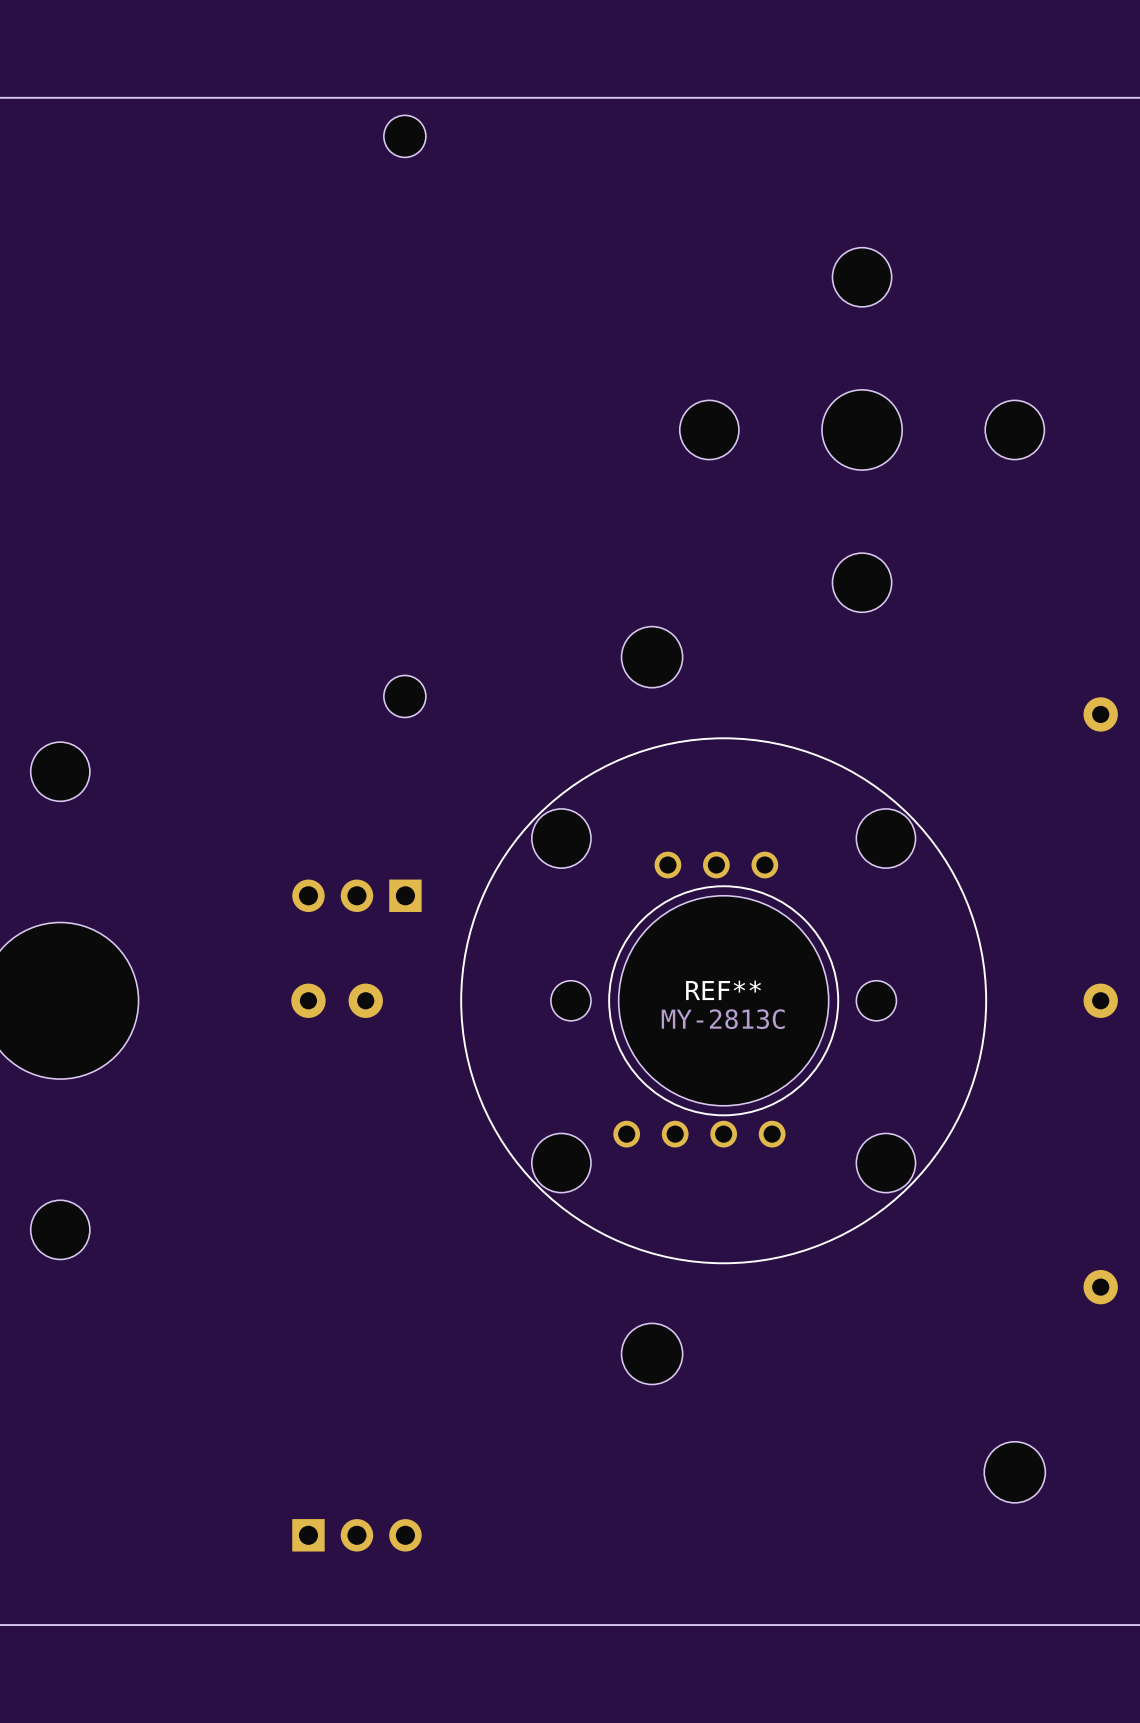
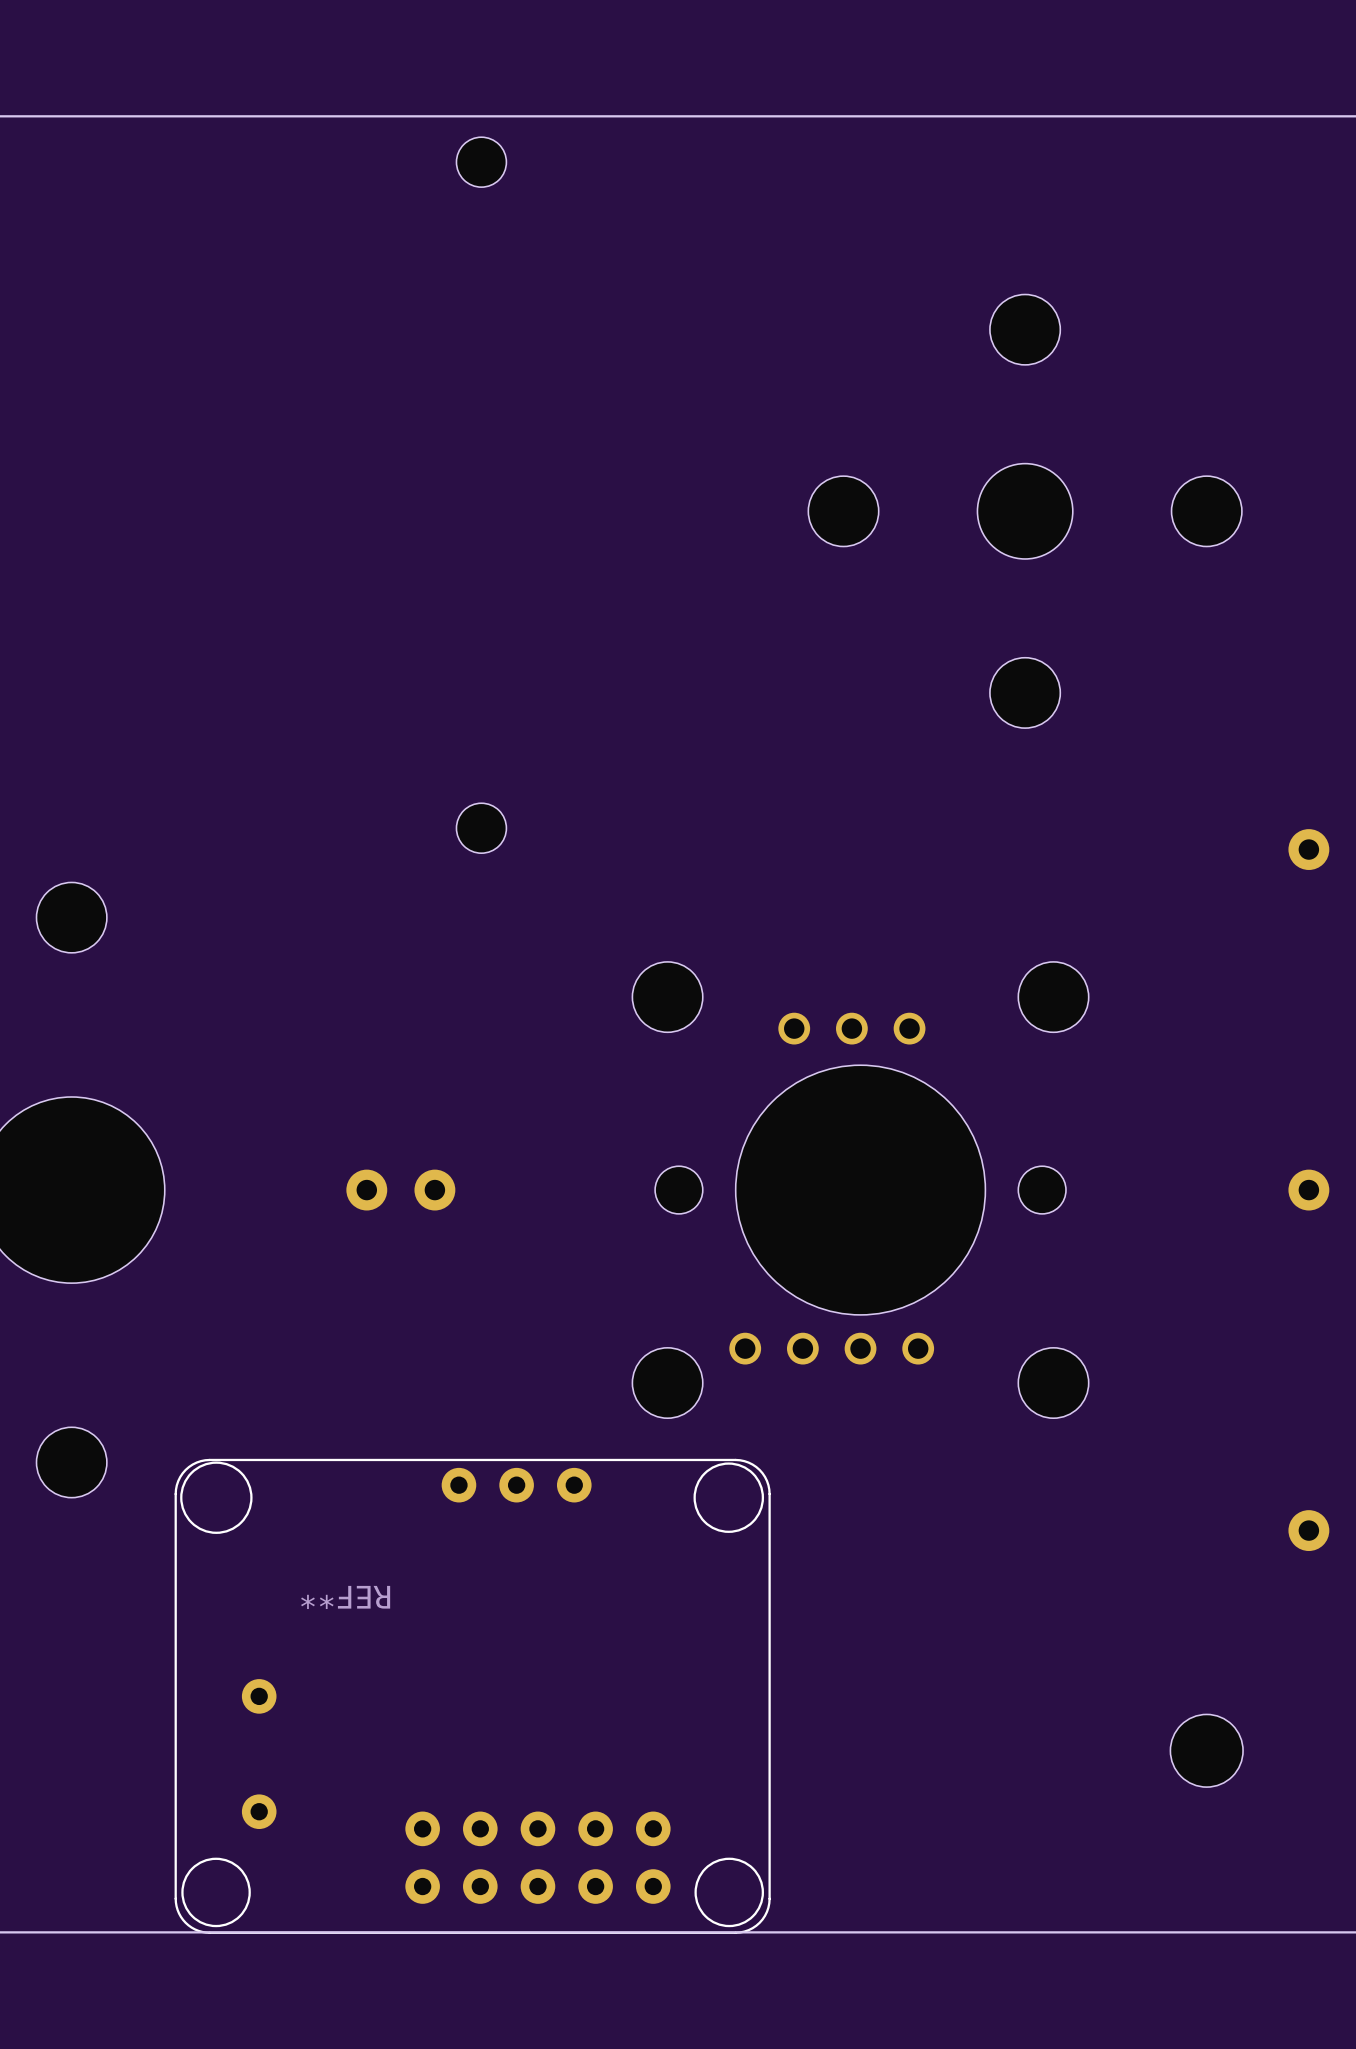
part: (652, 657) -> none
part: (356, 895) -> none
REF** side: bottom (723, 1000) -> top (860, 1190)
part: (652, 1353) -> none
REF**: none -> (472, 1696)
part: (356, 1535) -> none

